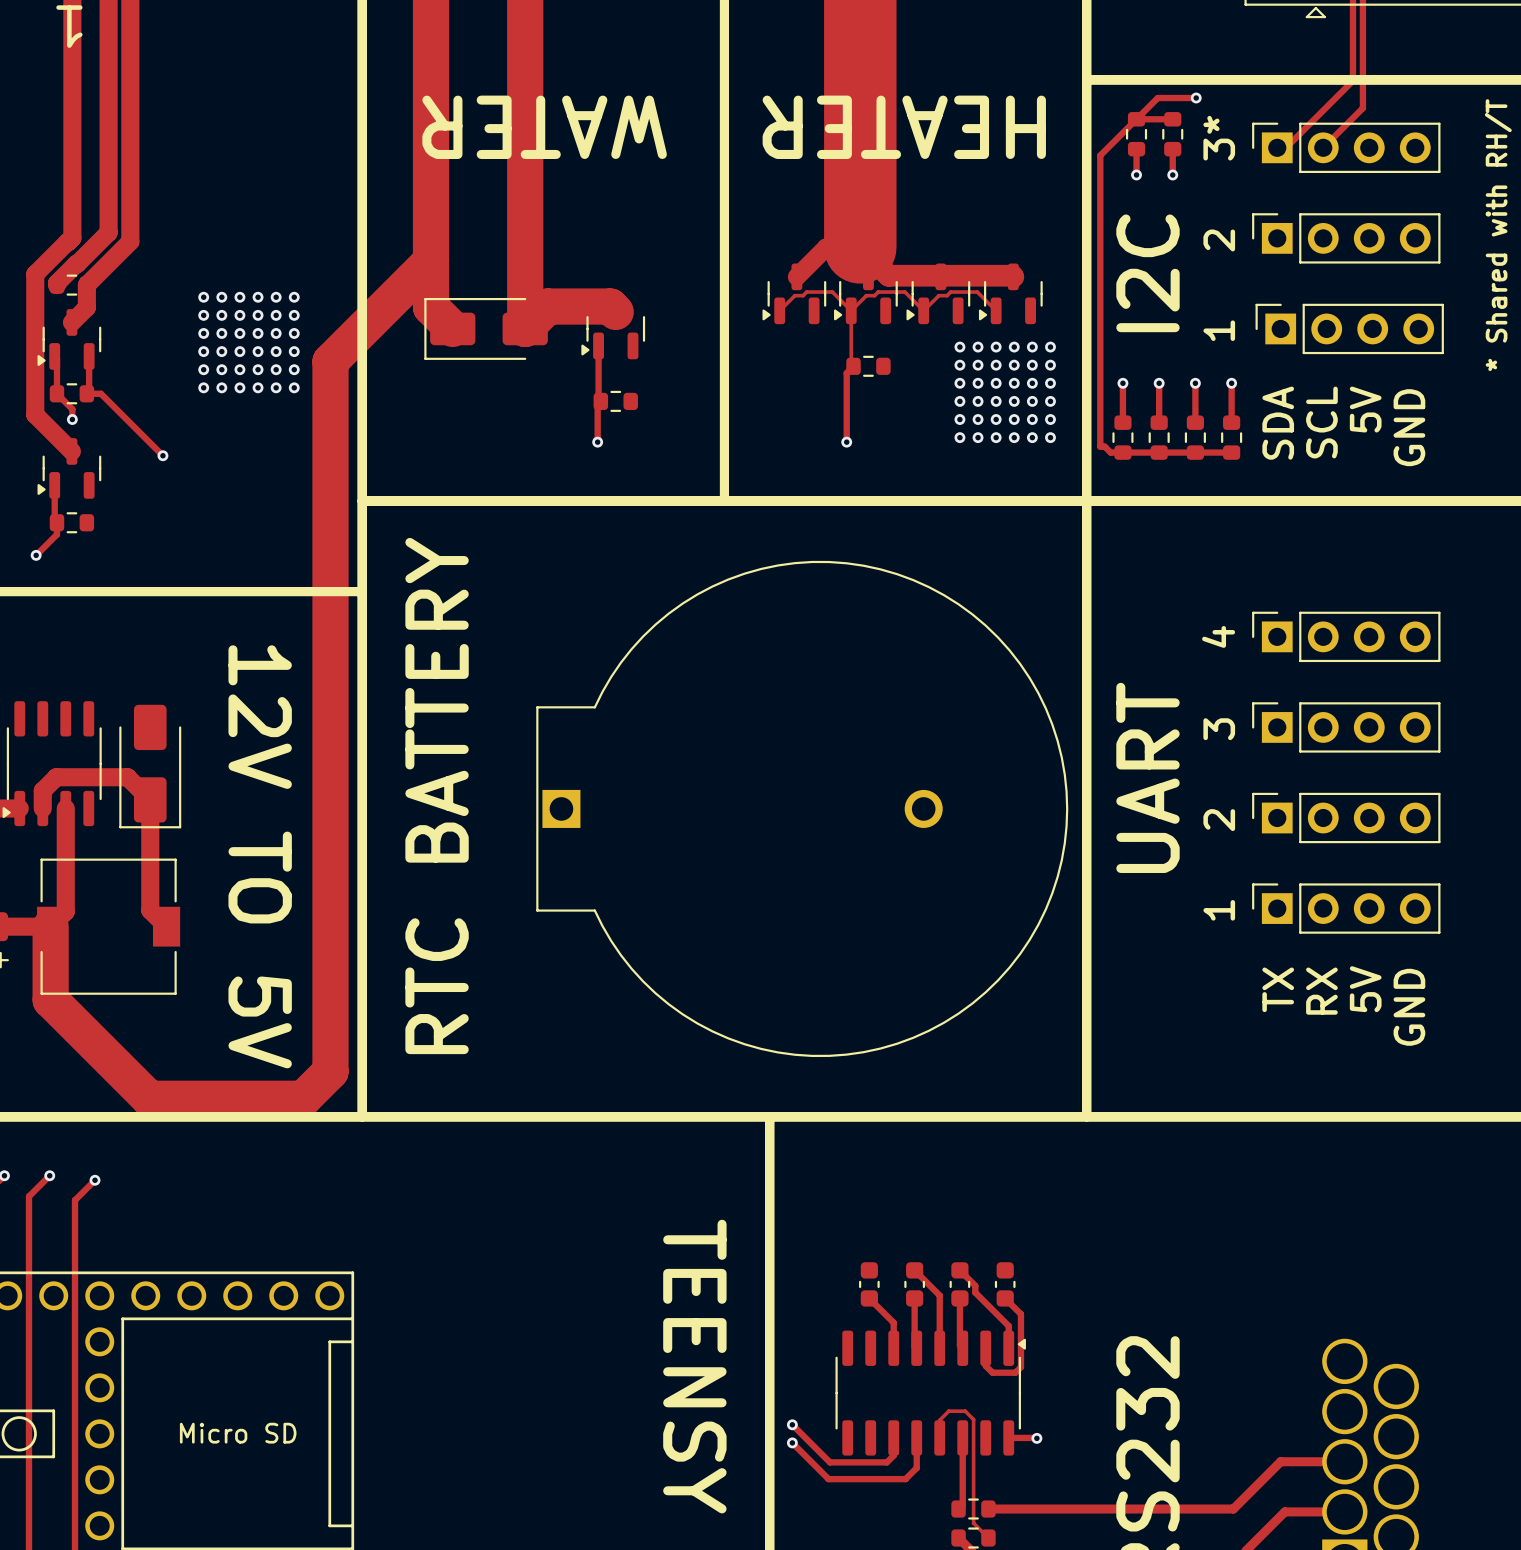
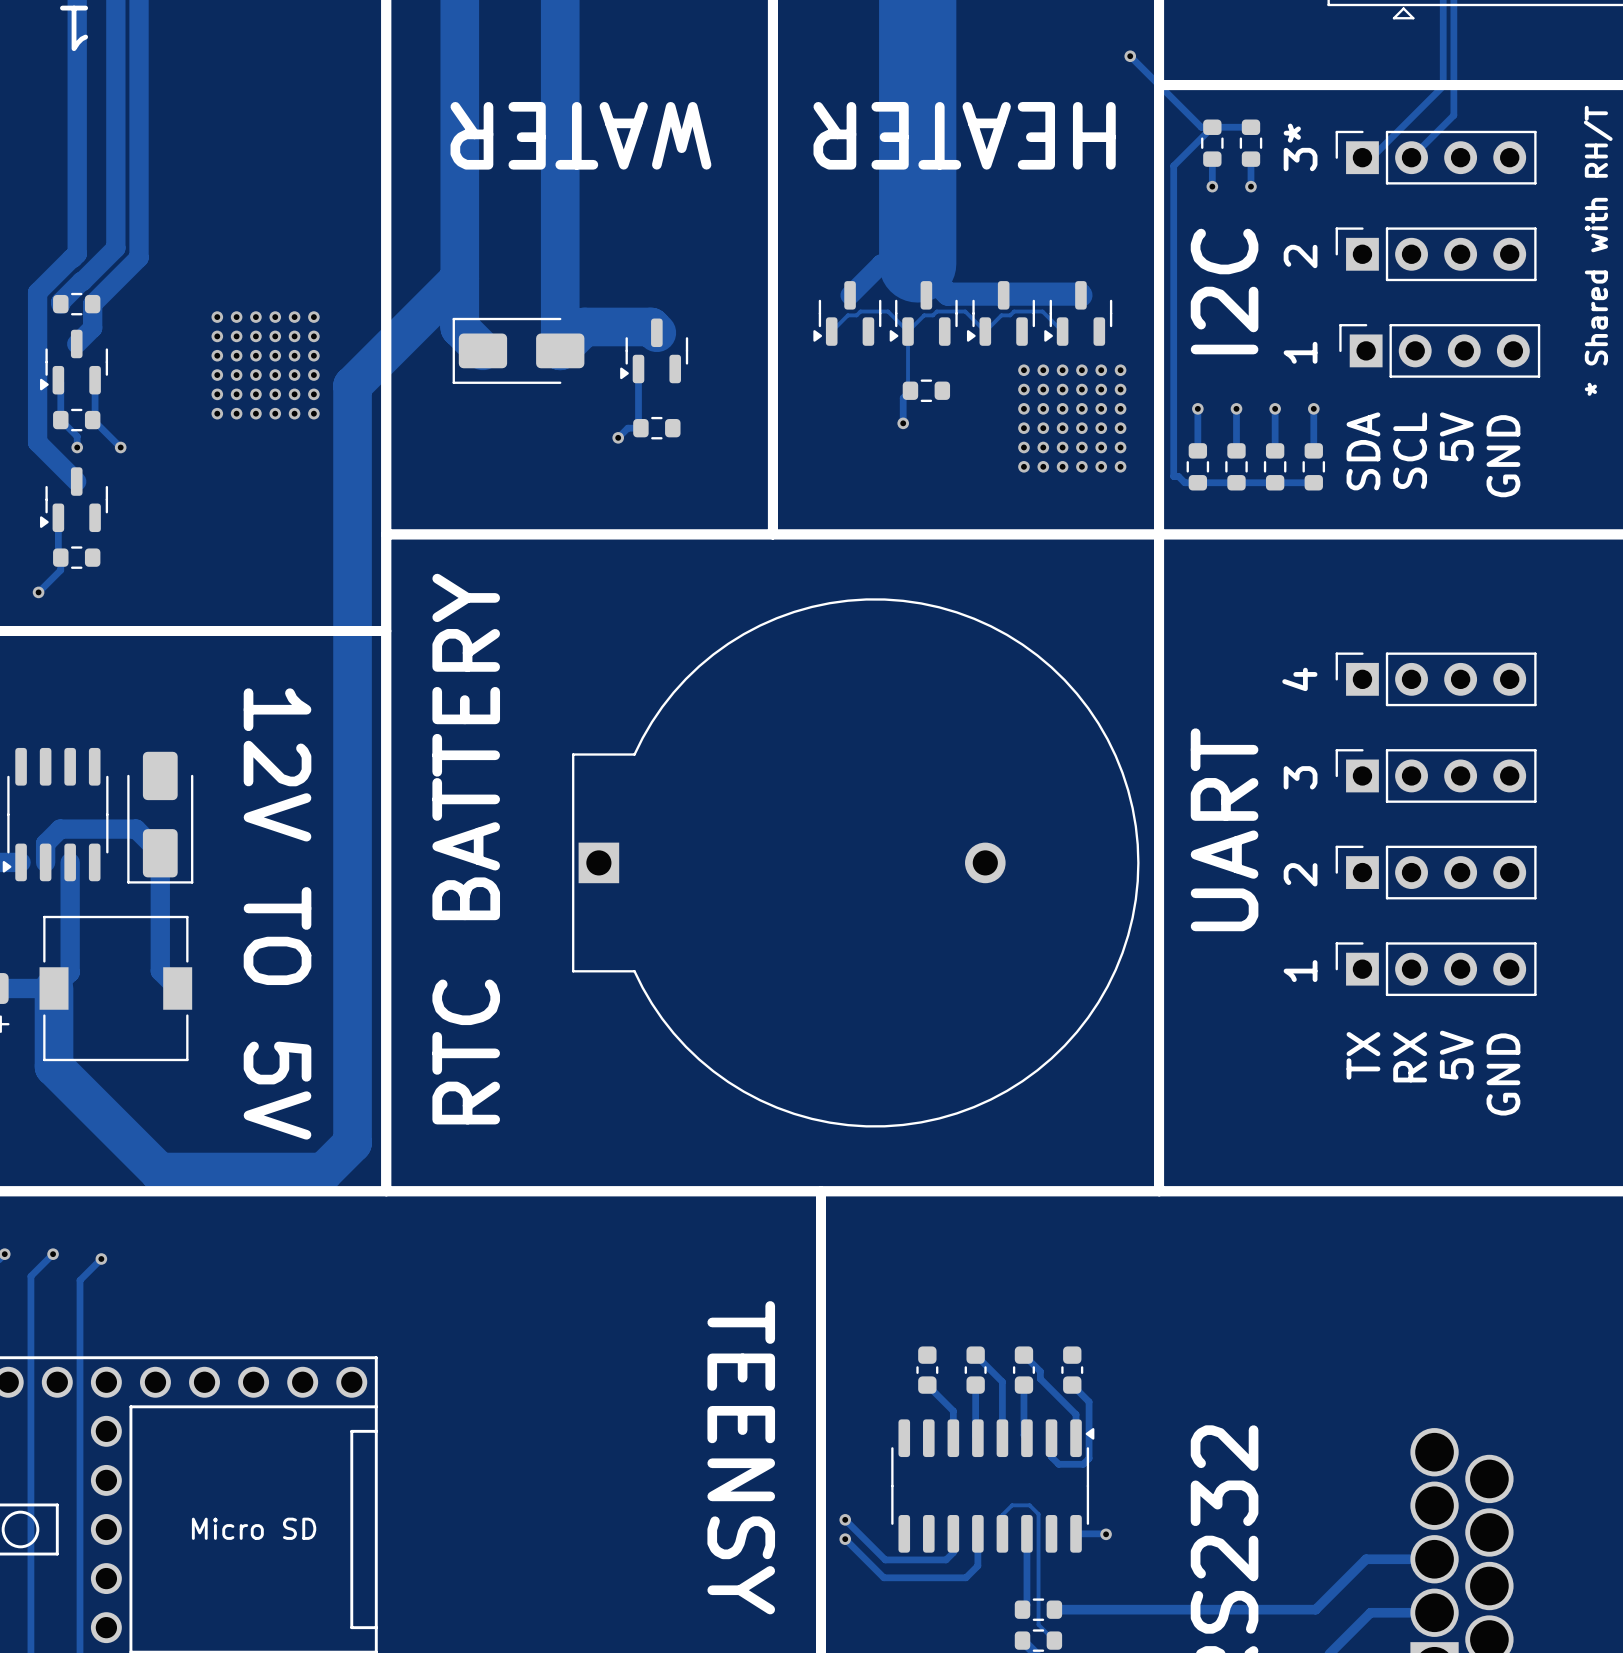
via: none -> (1130, 56)
track: (1196, 98) (1157, 98) (1136, 119) -> (1130, 56) (1201, 127) (1212, 127)
via: (1196, 98) -> none
track: (87, 393) (101, 393) (162, 455) -> (93, 420) (120, 447)
track: (846, 396) (846, 442) -> none
track: (600, 401) (597, 404) (597, 442) -> (640, 428) (627, 428) (618, 437)
via position: (597, 442) -> (618, 437)
via position: (846, 442) -> (903, 423)
via position: (162, 455) -> (120, 447)

